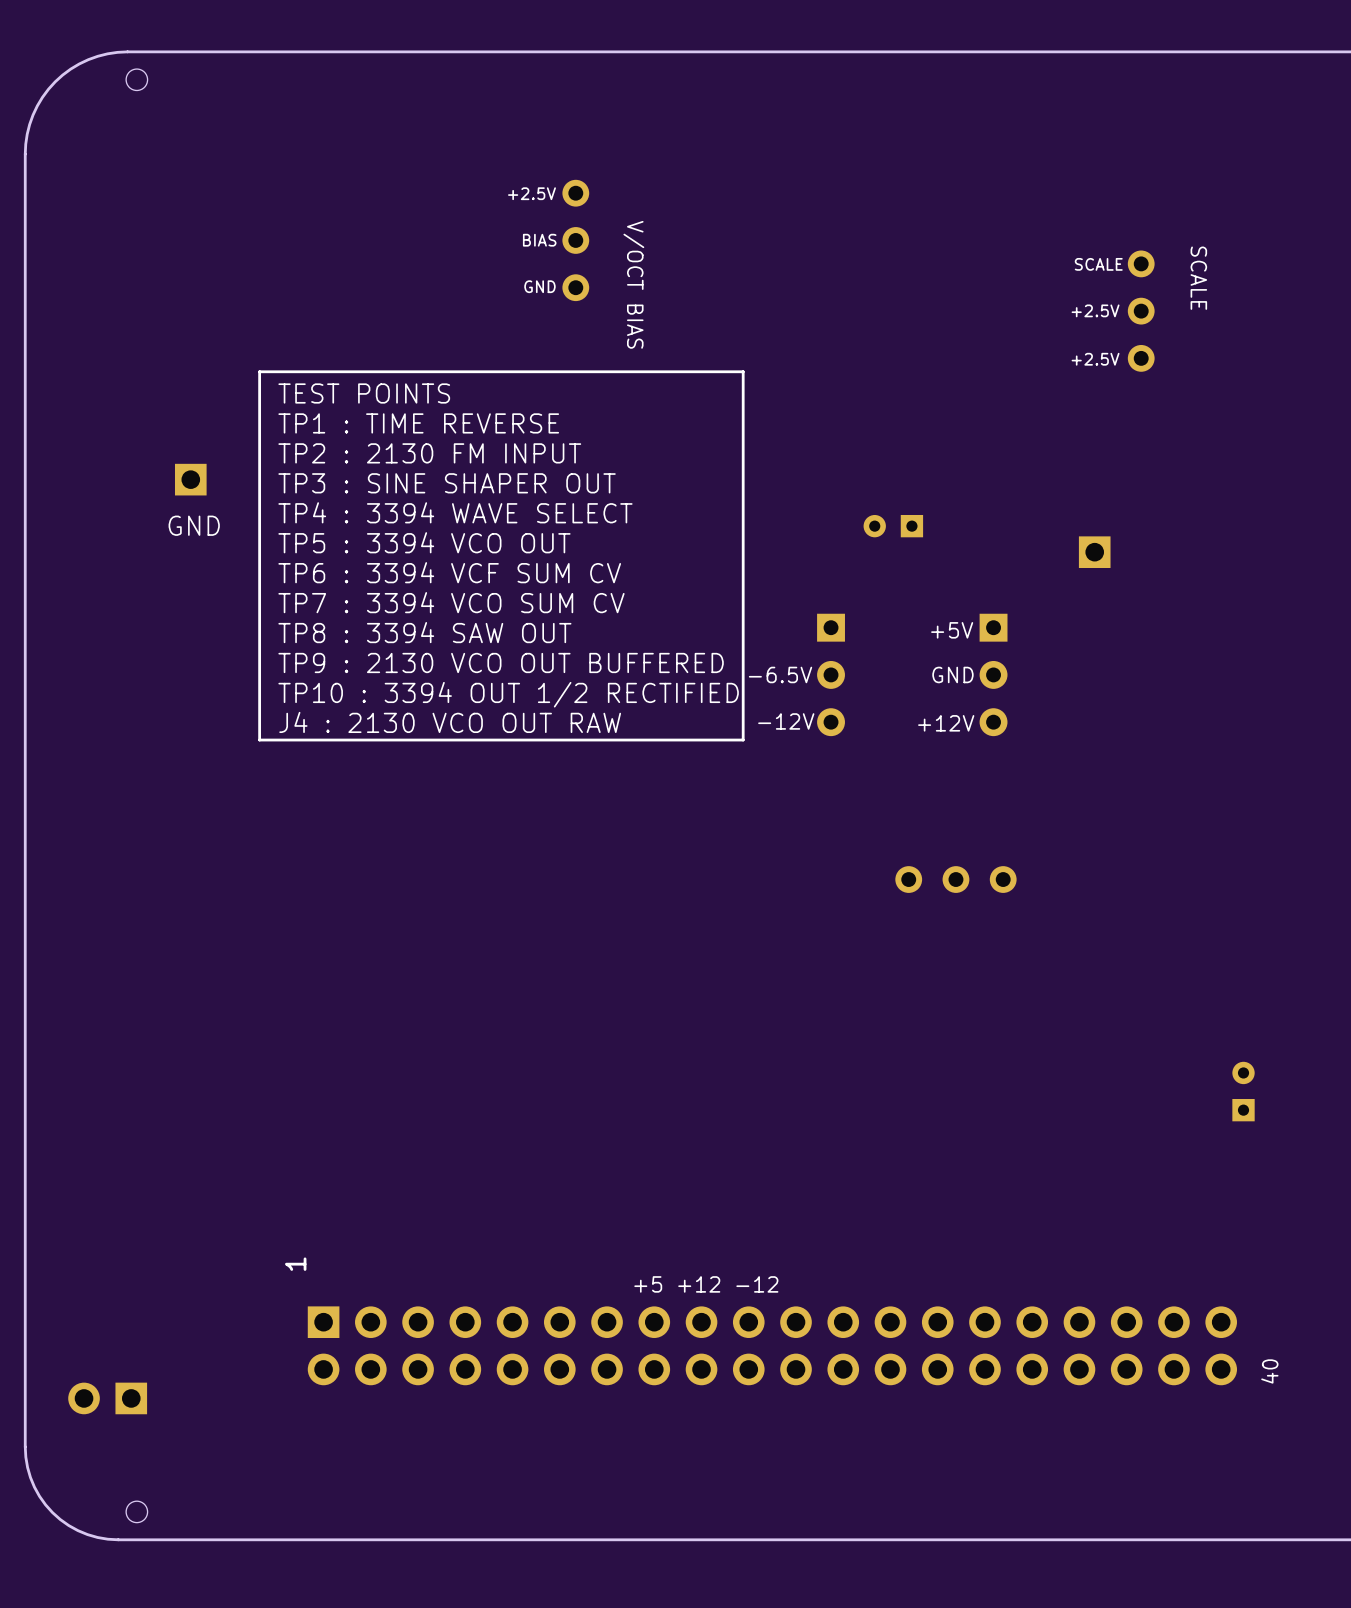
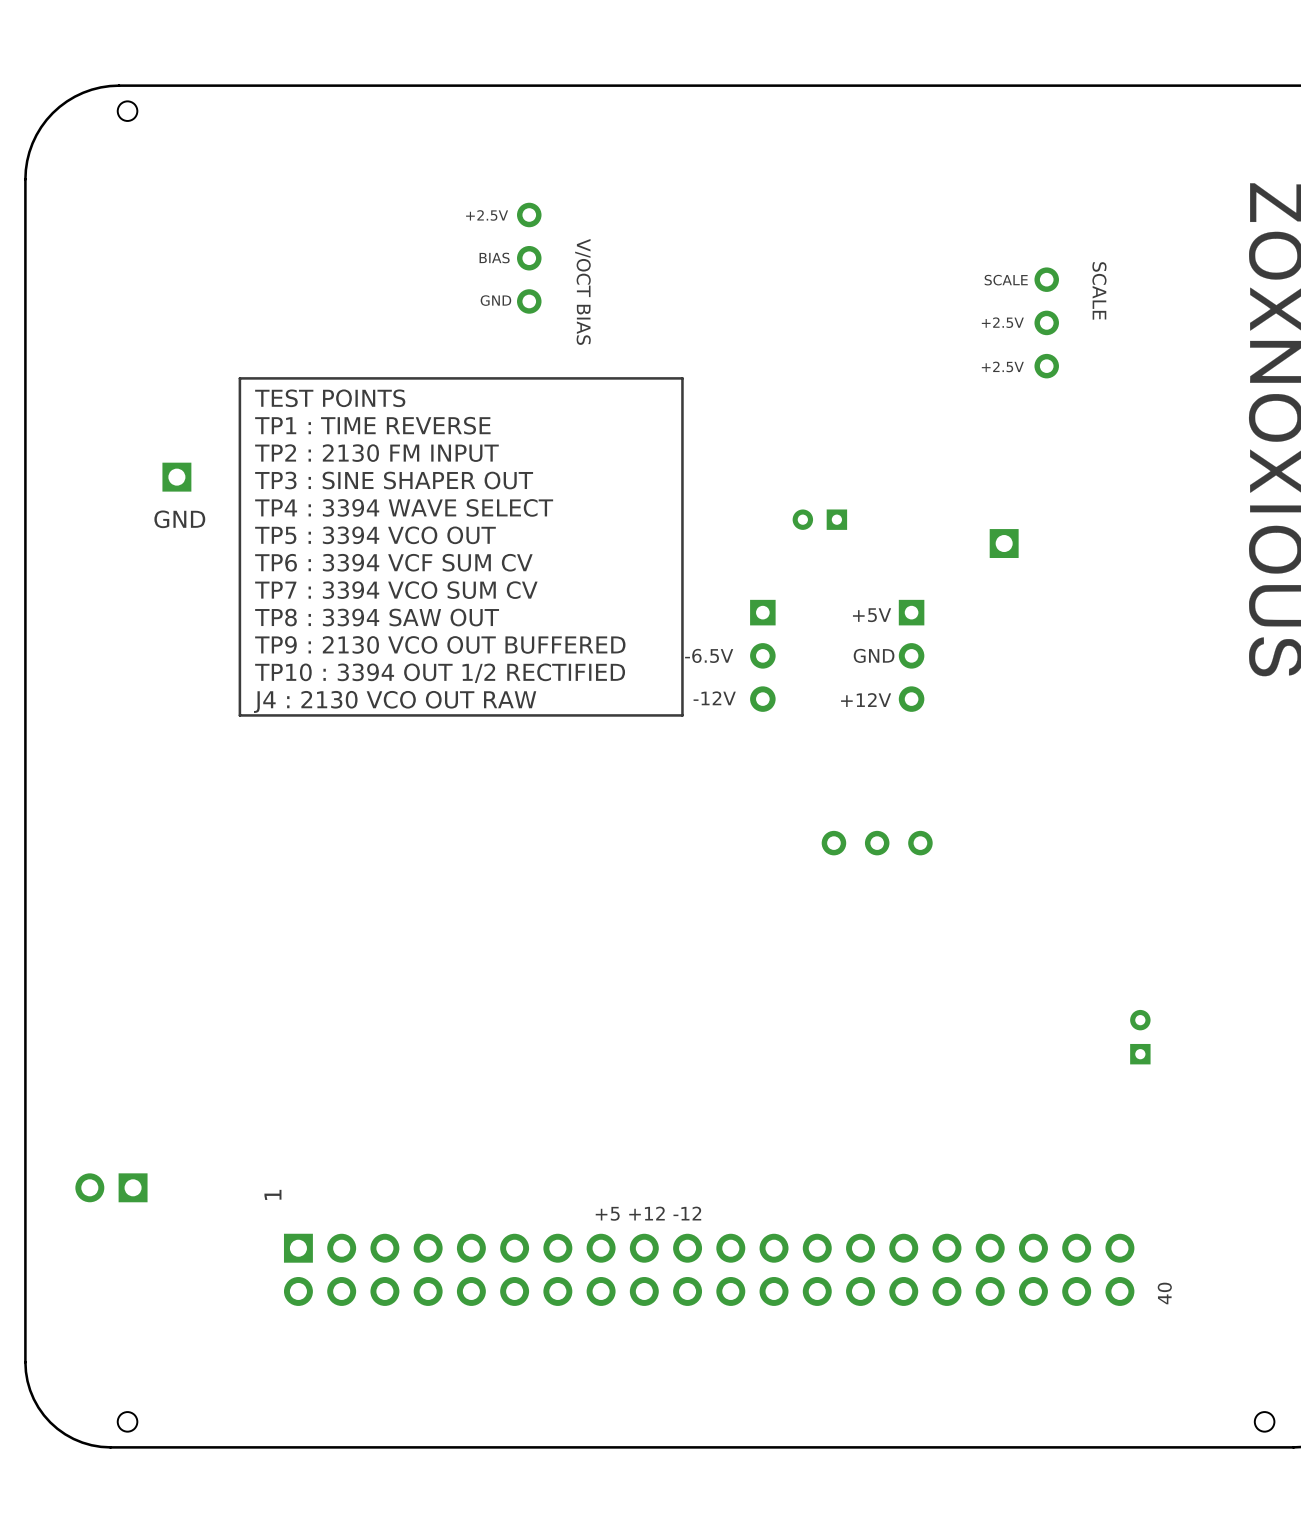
part position: (107, 1398) -> (111, 1187)

